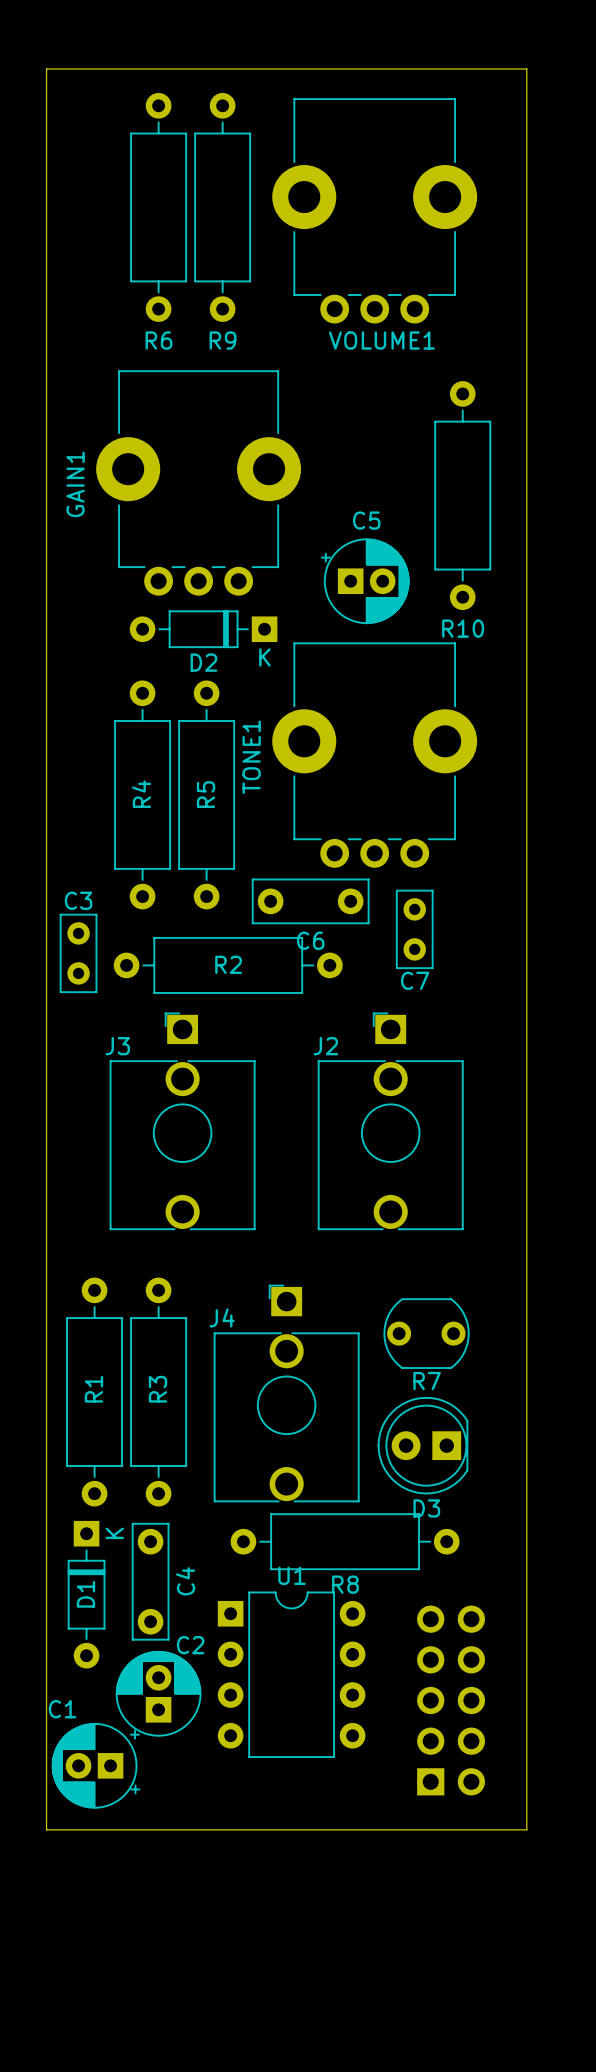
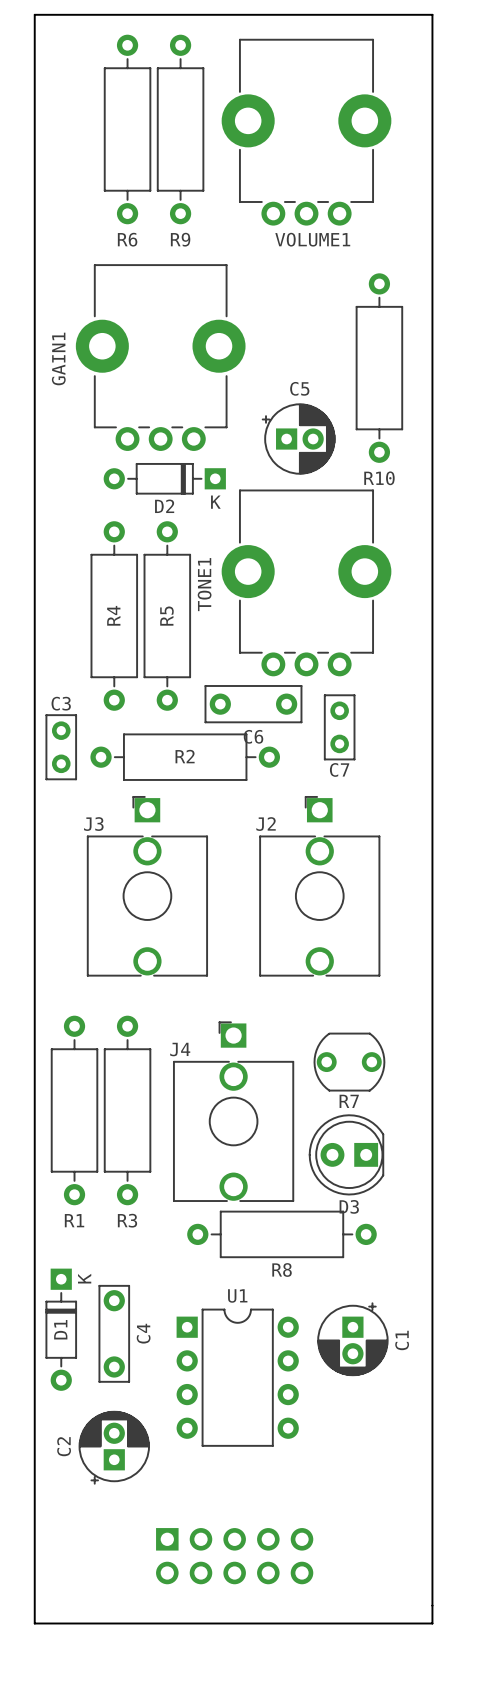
R1 name rotation: 0° (93, 1389) -> 90° clockwise (74, 1220)
R1 name position: R1 (93, 1389) -> R1 (74, 1220)
R3 name rotation: 0° (157, 1389) -> 90° clockwise (127, 1220)
R3 name position: R3 (157, 1389) -> R3 (127, 1220)
C4 position: (150, 1581) -> (114, 1333)
D1 position: (86, 1594) -> (61, 1329)
C2 name rotation: 0° (190, 1645) -> 90° counterclockwise (64, 1446)
C2 name position: C2 (190, 1645) -> C2 (64, 1446)
U1 position: (291, 1674) -> (237, 1377)
C2 position: (158, 1695) -> (114, 1447)
part rotation: 0° (451, 1700) -> 90° clockwise (234, 1556)
part position: (451, 1700) -> (234, 1556)
C1 name position: C1 (62, 1709) -> C1 (402, 1340)
C1 rotation: 0° (96, 1765) -> 90° counterclockwise (352, 1339)
C1 position: (96, 1765) -> (352, 1339)
board edge: (46, 1829) (526, 1829) -> (34, 1473) (34, 1623) (432, 1623) (432, 1473)

